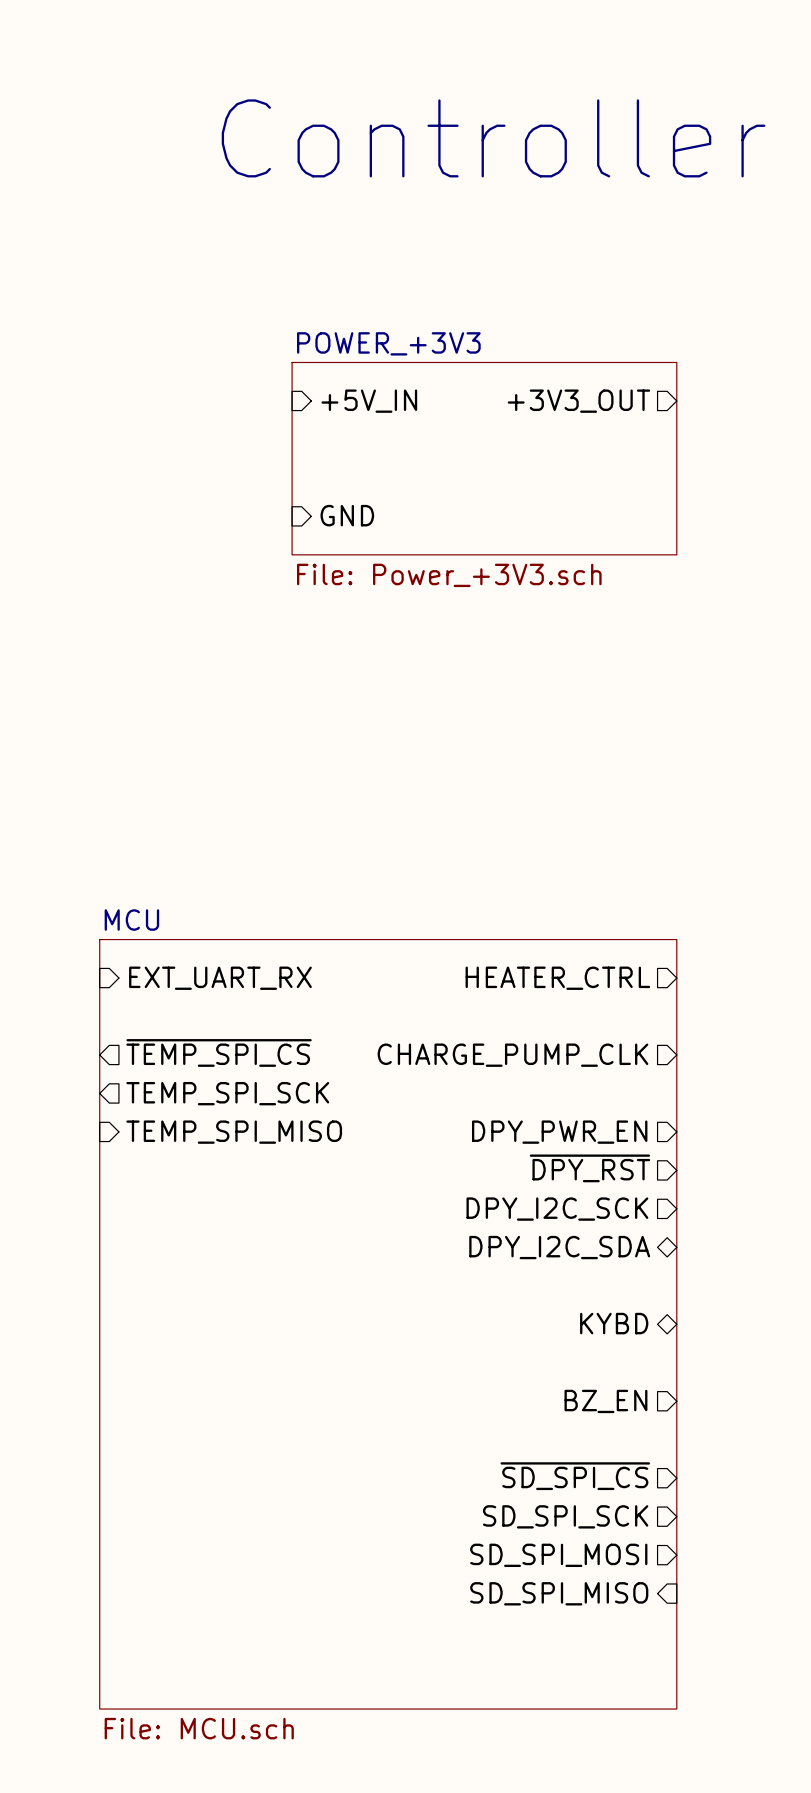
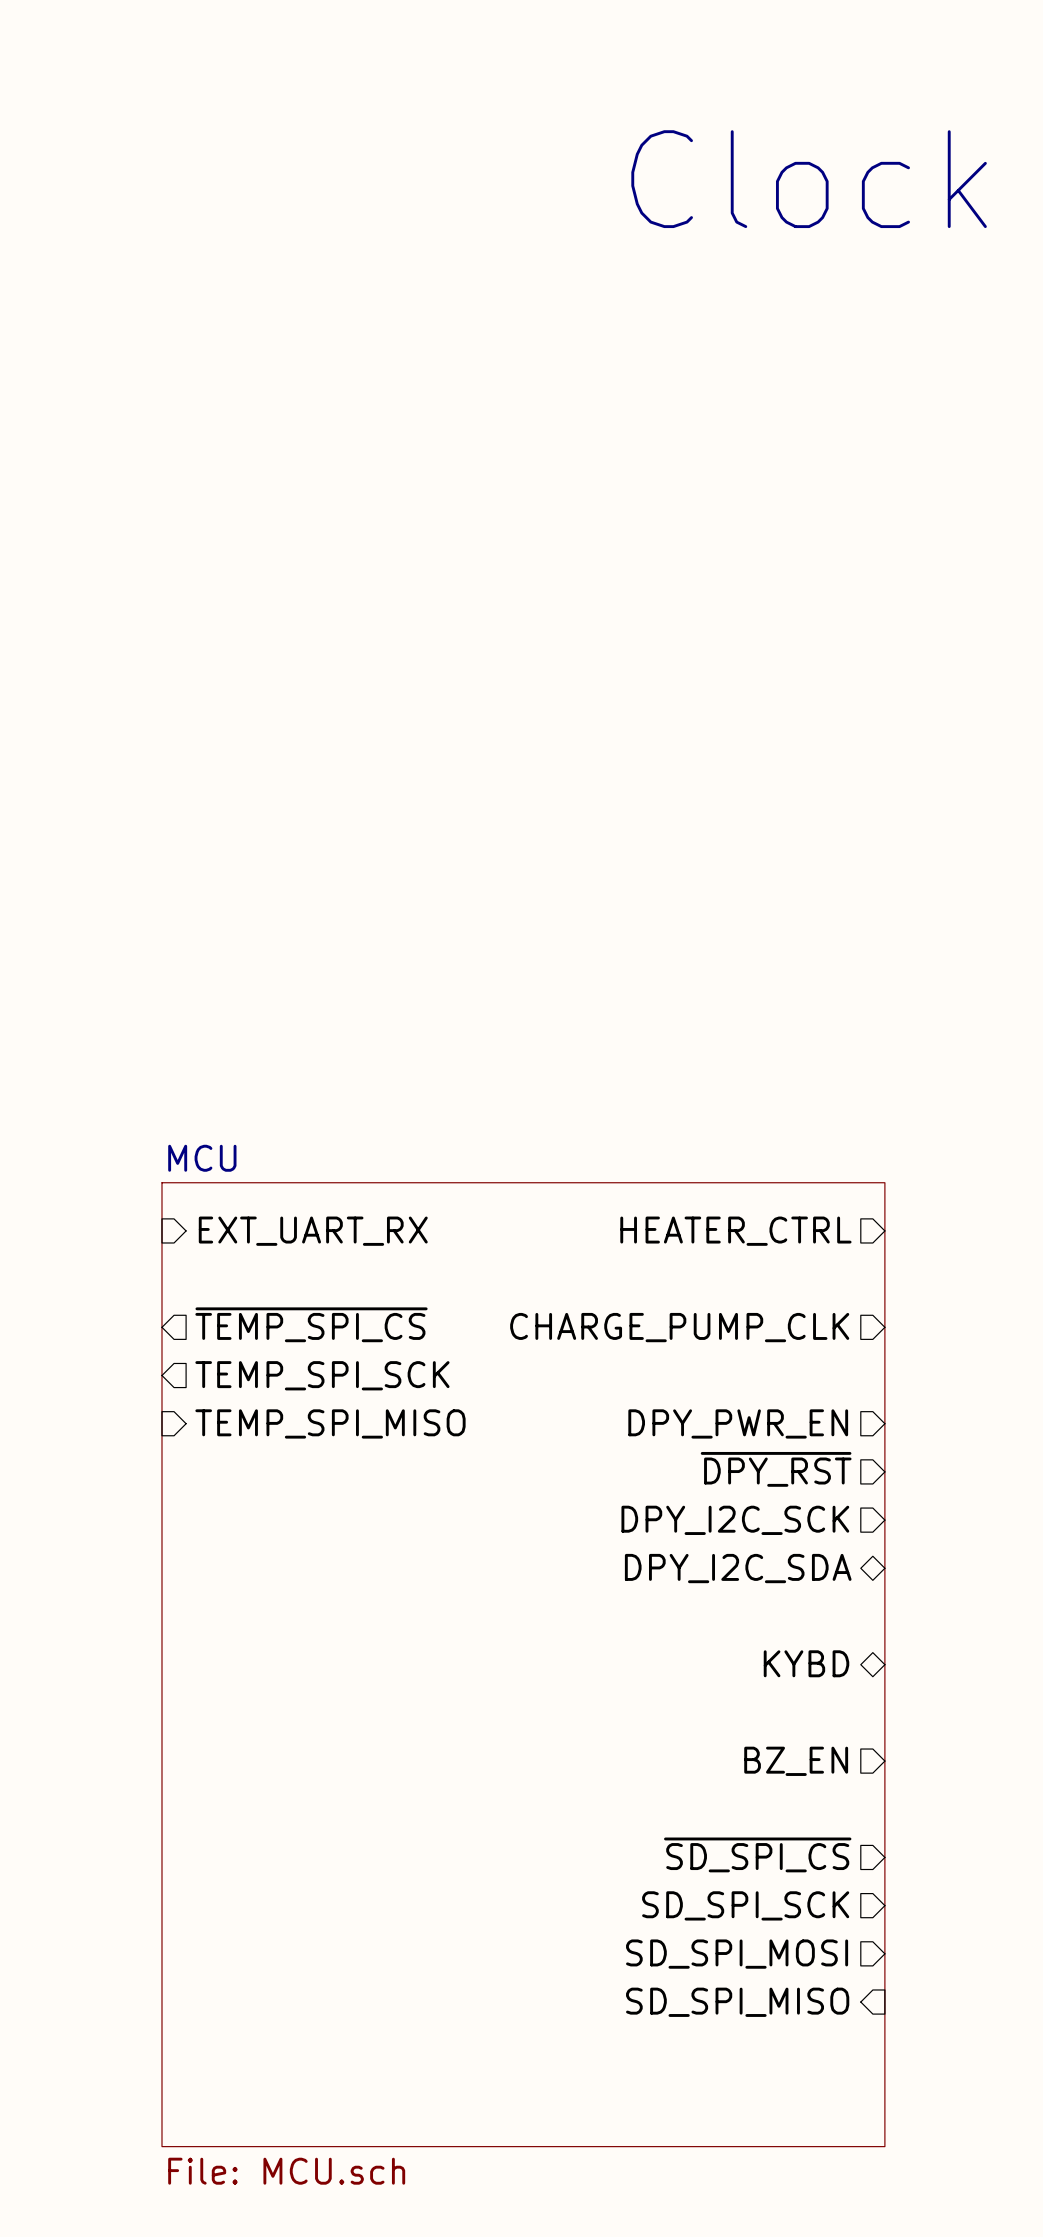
text: Controller (493, 138) -> Clock (809, 179)
sheet pin: +5V_IN (369, 401) -> none
sheet pin: +3V3_OUT (578, 401) -> none
sheet POWER_+3V3: File: Power_+3V3.sch (484, 458) -> none
sheet pin: GND (347, 515) -> none

